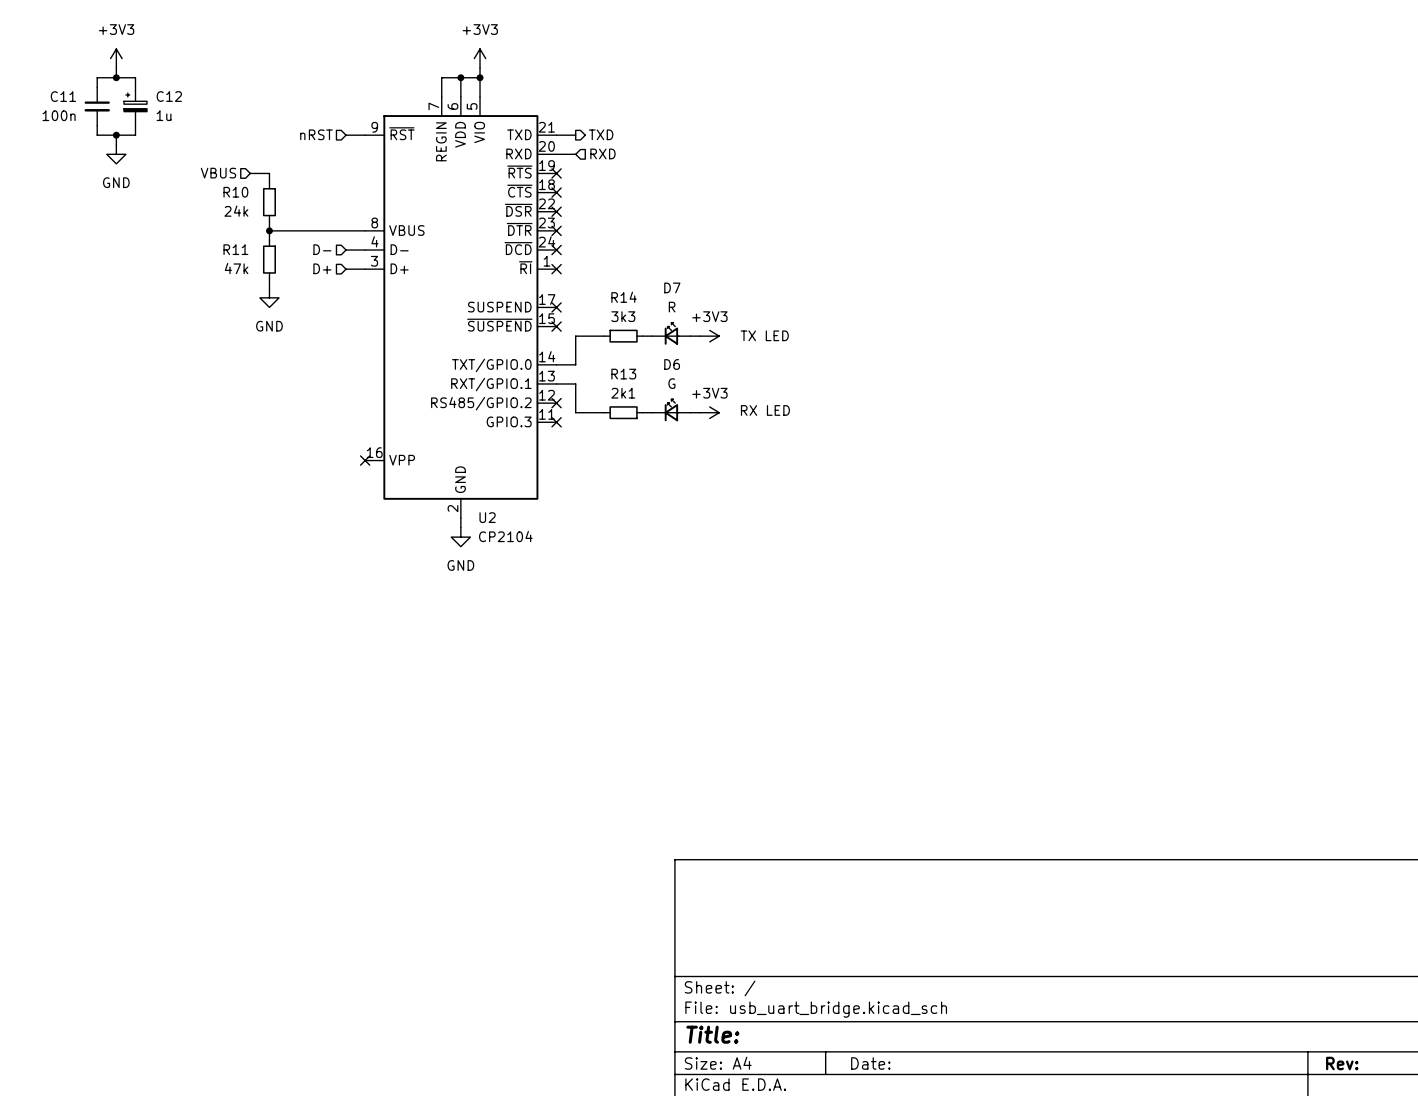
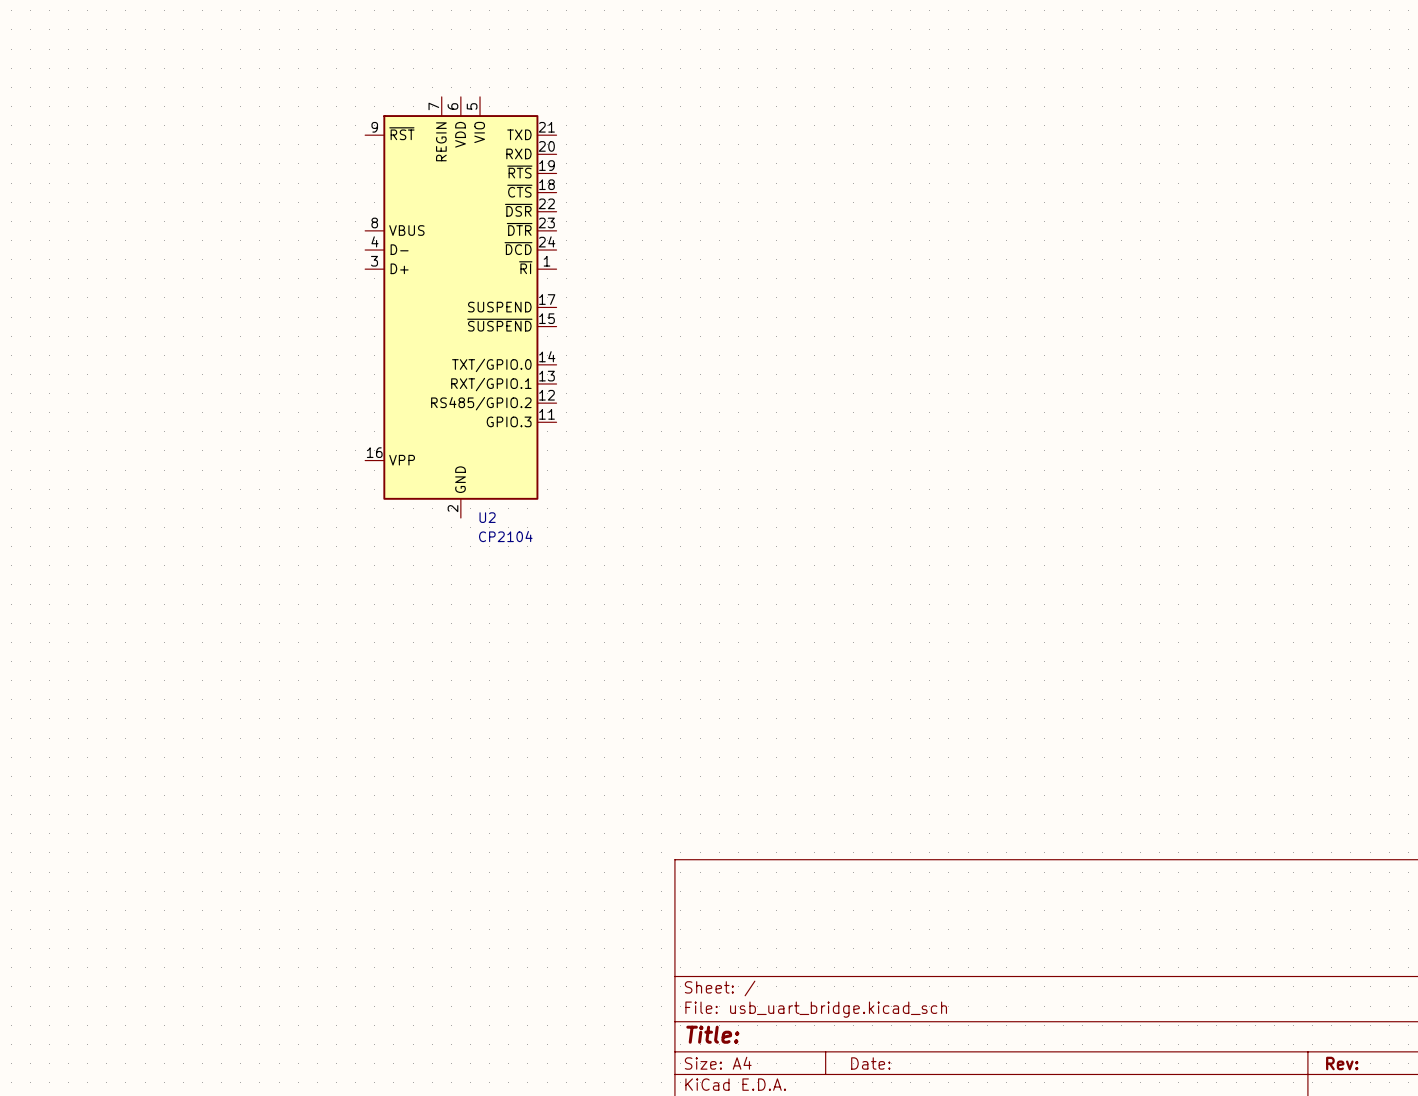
power symbol: +3V3 (116, 58) -> none
power symbol: +3V3 (480, 58) -> none
wire: (116, 68) (116, 77) -> none
wire: (480, 68) (480, 96) -> none
junction: (116, 77) -> none
wire: (460, 77) (460, 96) -> none
junction: (460, 77) -> none
wire: (480, 77) (441, 77) (441, 96) -> none
junction: (480, 77) -> none
wire: (97, 87) (97, 77) (135, 77) (135, 87) -> none
C11: 100n (97, 106) -> none
C12: 1u (135, 106) -> none
wire: (97, 125) (97, 135) (135, 135) (135, 125) -> none
hierarchical label: nRST (316, 134) -> none
hierarchical label: TXD (601, 134) -> none
wire: (116, 135) (116, 144) -> none
junction: (116, 135) -> none
wire: (346, 135) (365, 135) -> none
wire: (556, 135) (575, 135) -> none
hierarchical label: RXD (602, 153) -> none
power symbol: GND (116, 154) -> none
wire: (556, 154) (575, 154) -> none
hierarchical label: VBUS (218, 173) -> none
wire: (250, 173) (269, 173) (269, 183) -> none
no-connect mark: (556, 173) -> none
no-connect mark: (556, 192) -> none
R10: 24k (269, 202) -> none
no-connect mark: (556, 211) -> none
wire: (269, 221) (269, 240) -> none
wire: (269, 230) (365, 230) -> none
junction: (269, 230) -> none
no-connect mark: (556, 230) -> none
hierarchical label: D- (322, 249) -> none
wire: (346, 250) (365, 250) -> none
no-connect mark: (556, 250) -> none
R11: 47k (269, 259) -> none
hierarchical label: D+ (322, 268) -> none
wire: (346, 269) (365, 269) -> none
no-connect mark: (556, 269) -> none
wire: (269, 278) (269, 288) -> none
power symbol: GND (269, 297) -> none
no-connect mark: (556, 307) -> none
no-connect mark: (556, 326) -> none
D7: R (671, 333) -> none
text: TX LED (764, 335) -> none
wire: (604, 336) (575, 336) (575, 364) (556, 364) -> none
R14: 3k3 (623, 336) -> none
wire: (642, 336) (652, 336) -> none
wire: (690, 336) (700, 336) -> none
power symbol: +3V3 (709, 336) -> none
wire: (556, 383) (575, 383) (575, 412) (604, 412) -> none
no-connect mark: (556, 403) -> none
D6: G (671, 410) -> none
text: RX LED (765, 410) -> none
R13: 2k1 (623, 412) -> none
wire: (642, 412) (652, 412) -> none
wire: (690, 412) (700, 412) -> none
power symbol: +3V3 (709, 412) -> none
no-connect mark: (556, 422) -> none
no-connect mark: (365, 460) -> none
wire: (460, 517) (460, 527) -> none
power symbol: GND (460, 537) -> none

